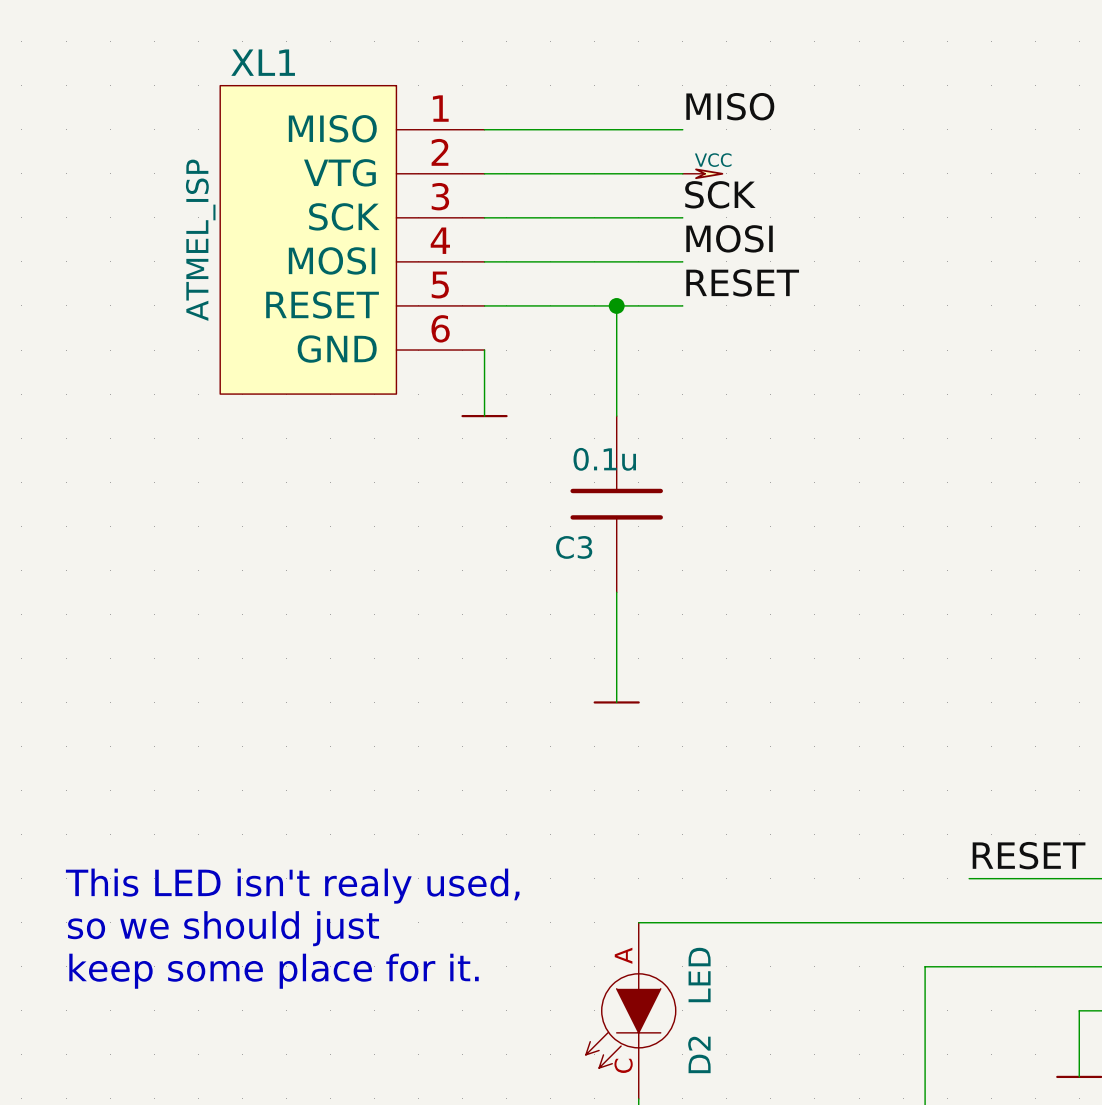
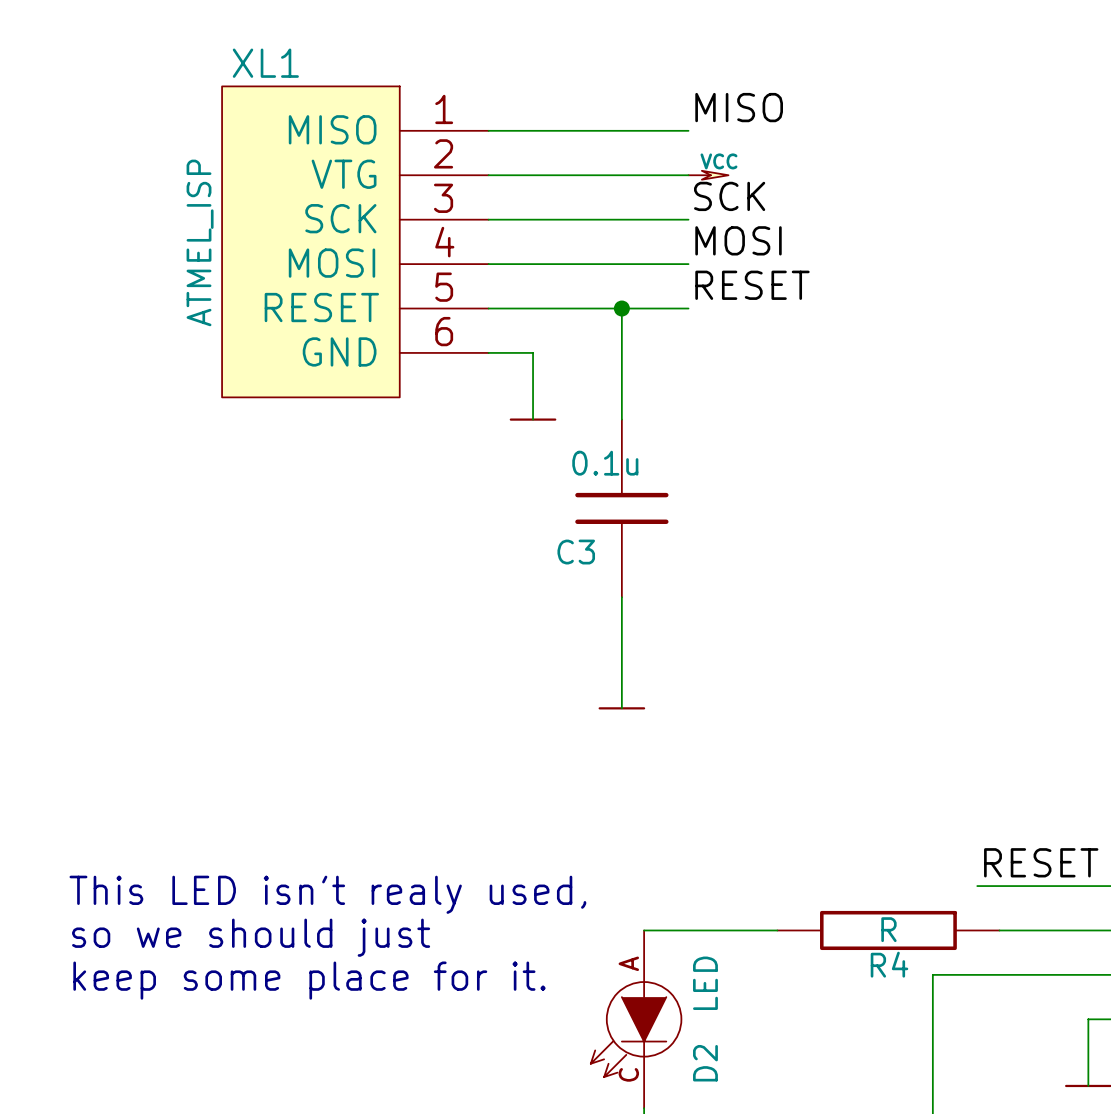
wire: (484, 350) (484, 416) -> (488, 352) (533, 352) (533, 419)
power symbol position: (484, 416) -> (533, 419)
wire: (770, 922) (991, 922) -> none
R4: none -> R (888, 930)

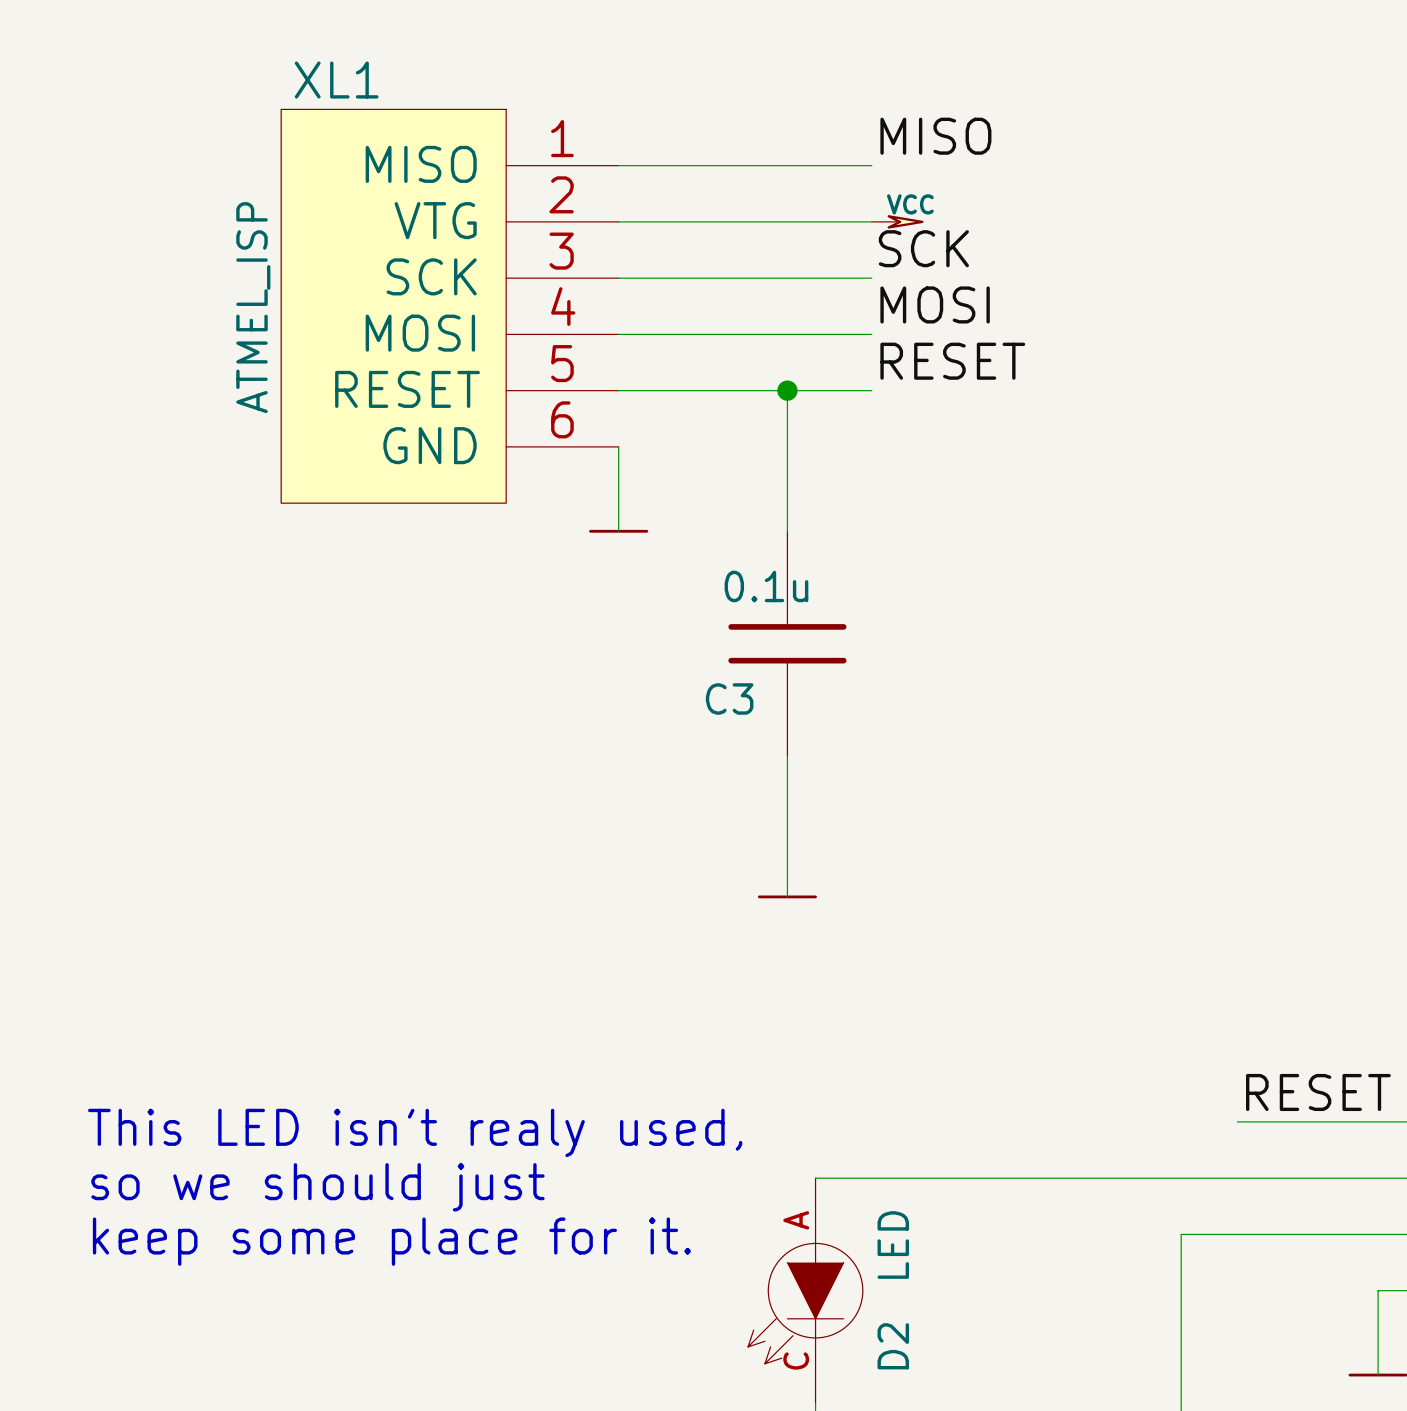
wire: (488, 352) (533, 352) (533, 419) -> (618, 446) (618, 531)
power symbol position: (533, 419) -> (618, 531)
wire: none -> (984, 1178) (1265, 1178)
R4: R (888, 930) -> none

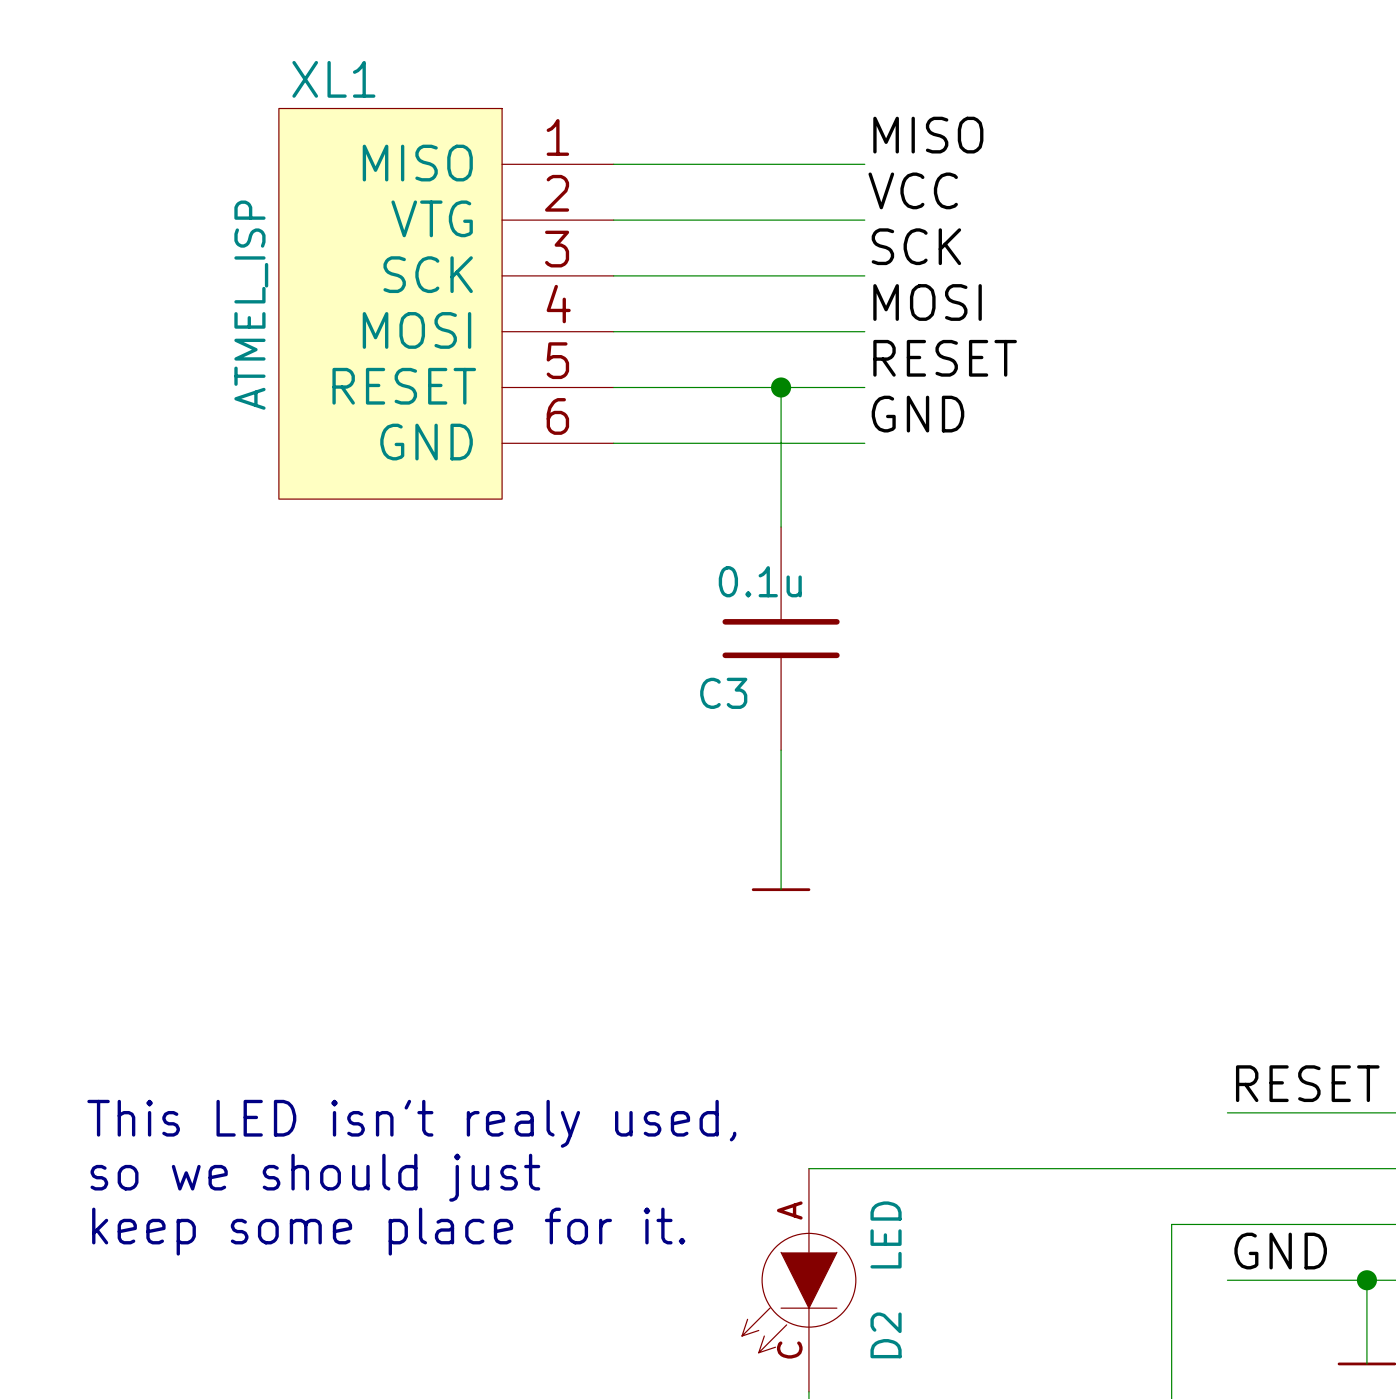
label: none -> VCC (913, 190)
power symbol: VCC (897, 221) -> none
label: none -> GND (917, 414)
wire: (618, 446) (618, 531) -> (613, 443) (864, 443)
power symbol: (618, 531) -> none
label: none -> GND (1280, 1251)
wire: none -> (1227, 1280) (1366, 1280)
junction: none -> (1366, 1280)

